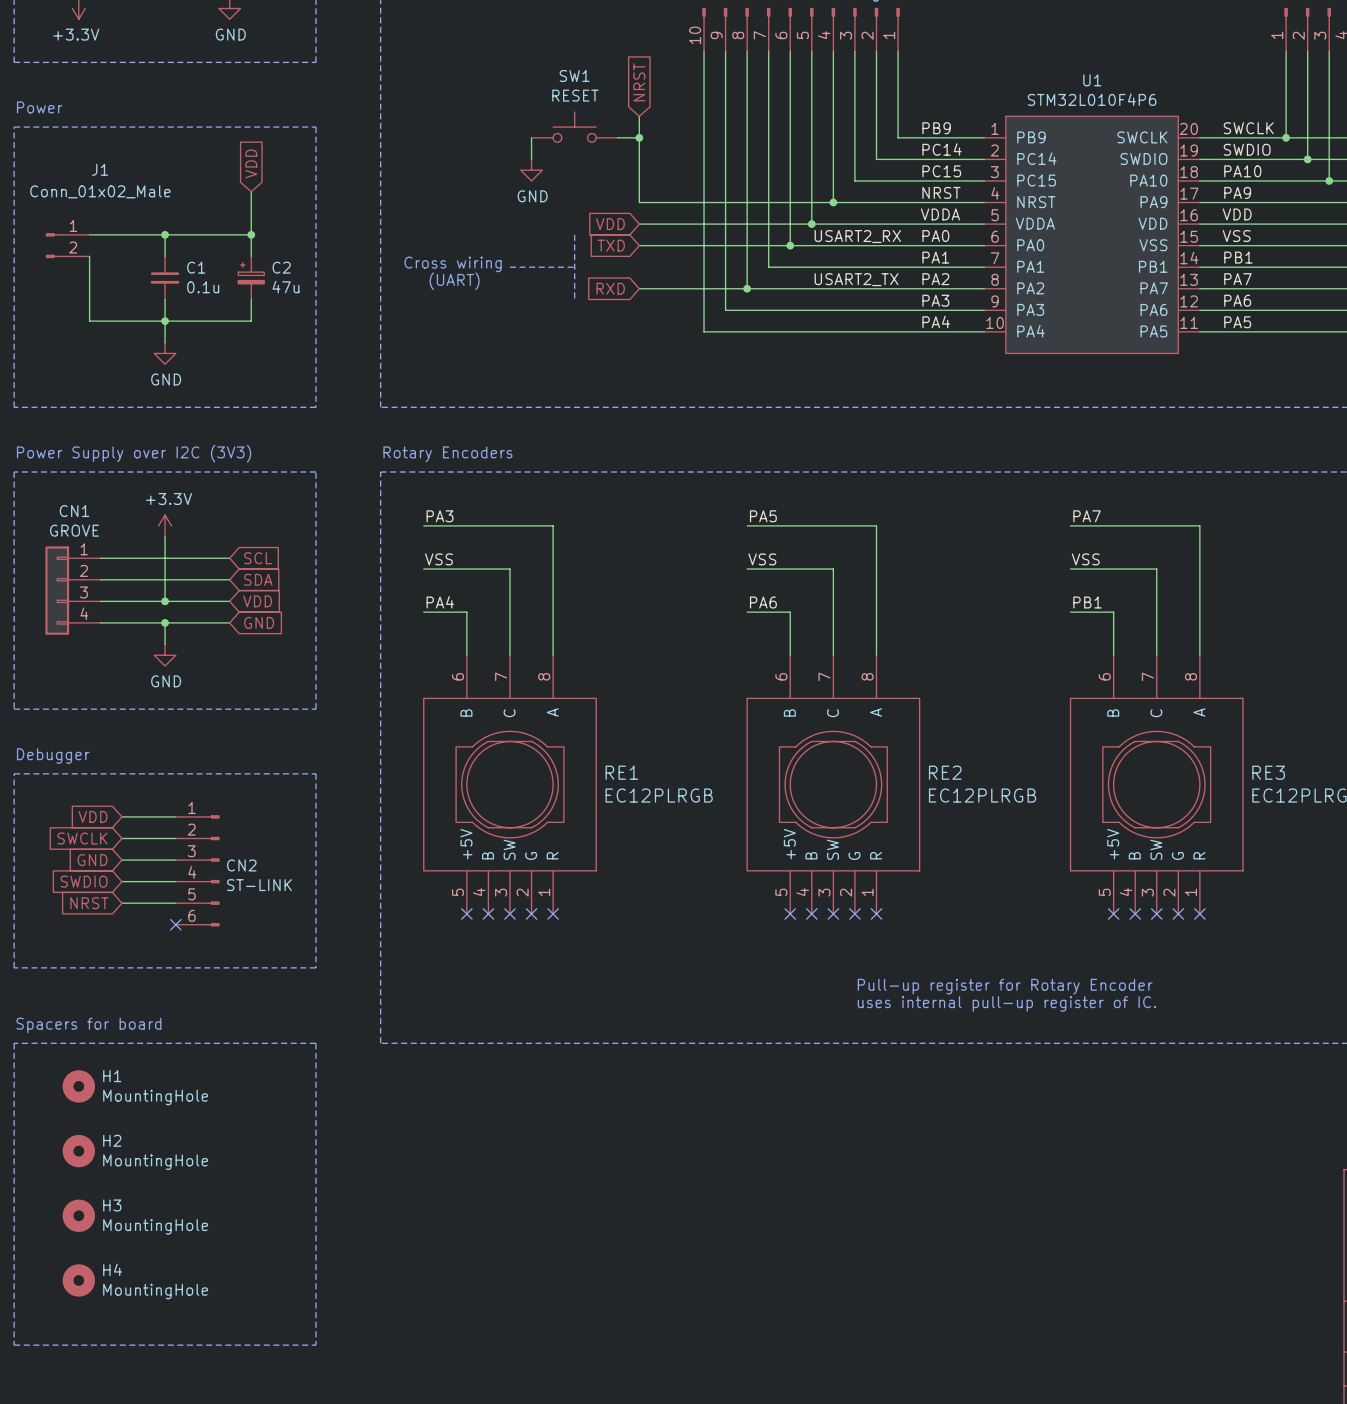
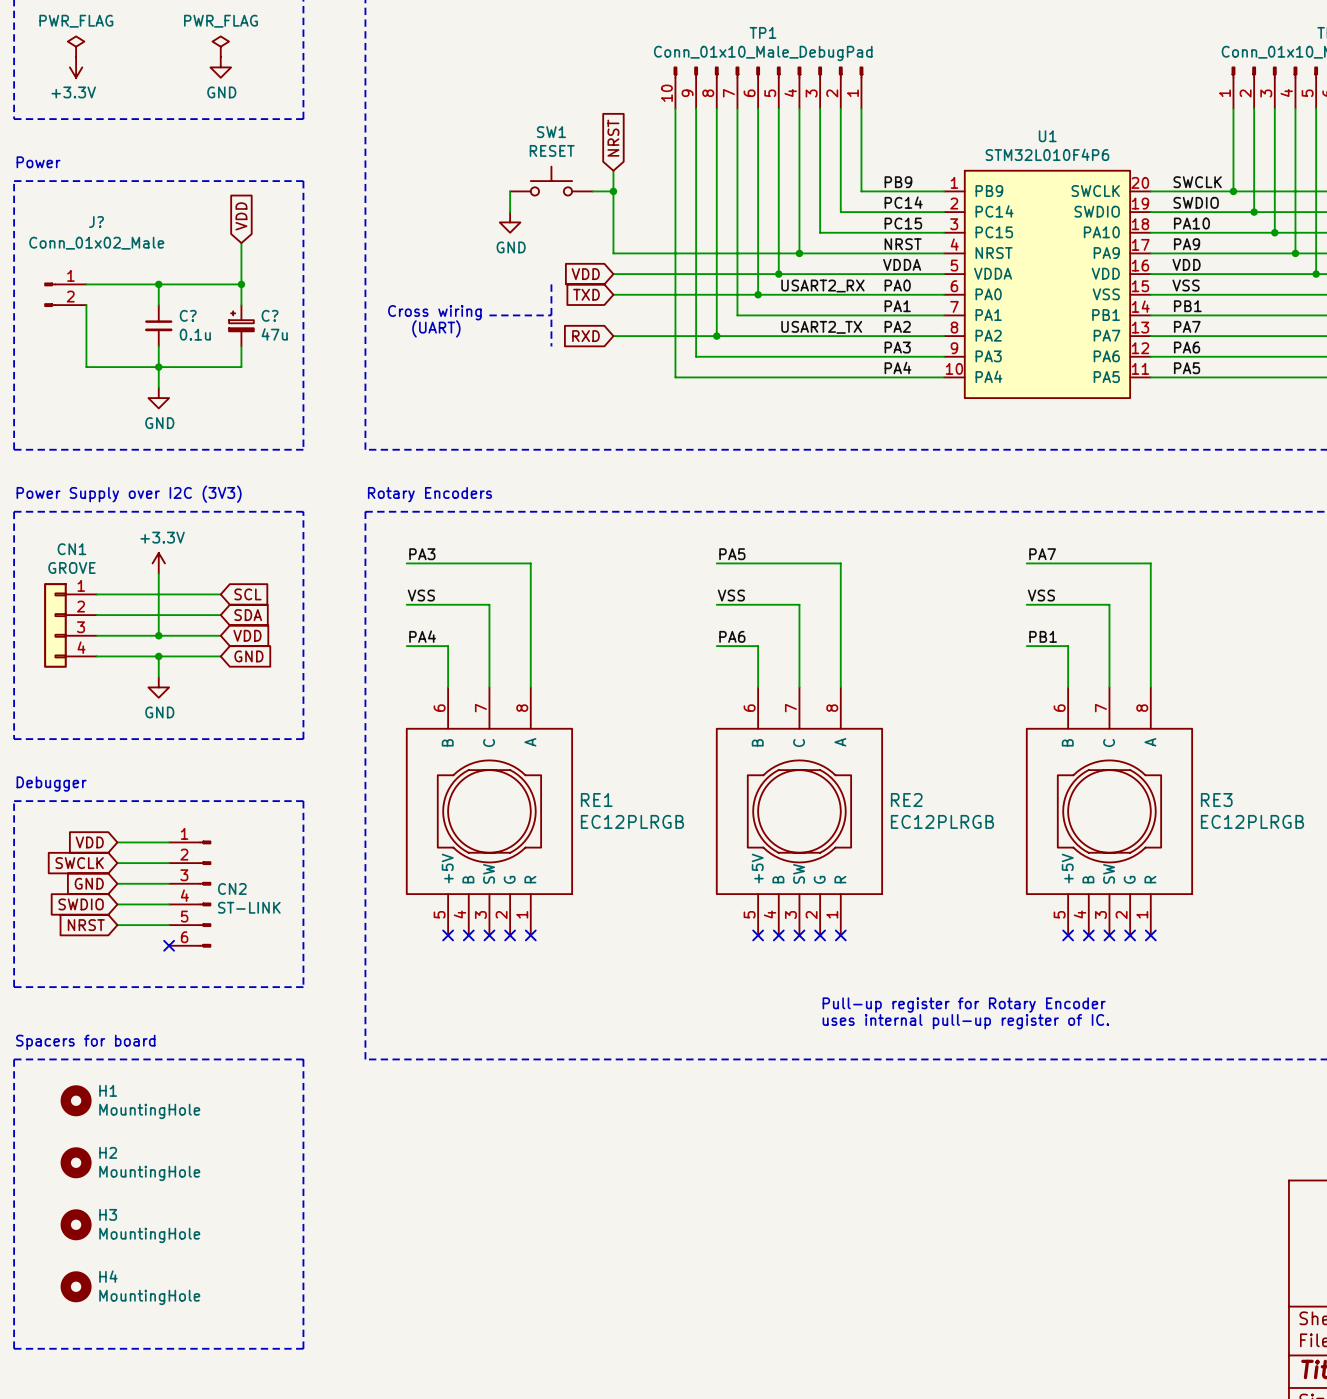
J1 name: J1 (100, 169) -> J? (96, 222)
C1 name: C1 (196, 267) -> C? (188, 315)
C2 name: C2 (281, 267) -> C? (270, 315)

